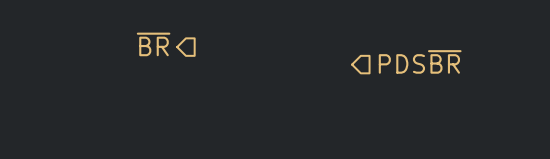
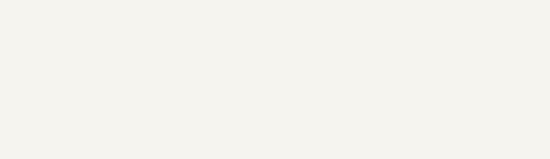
hierarchical label: ~{BR} (153, 44) -> none
hierarchical label: PDS~{BR} (420, 61) -> none

